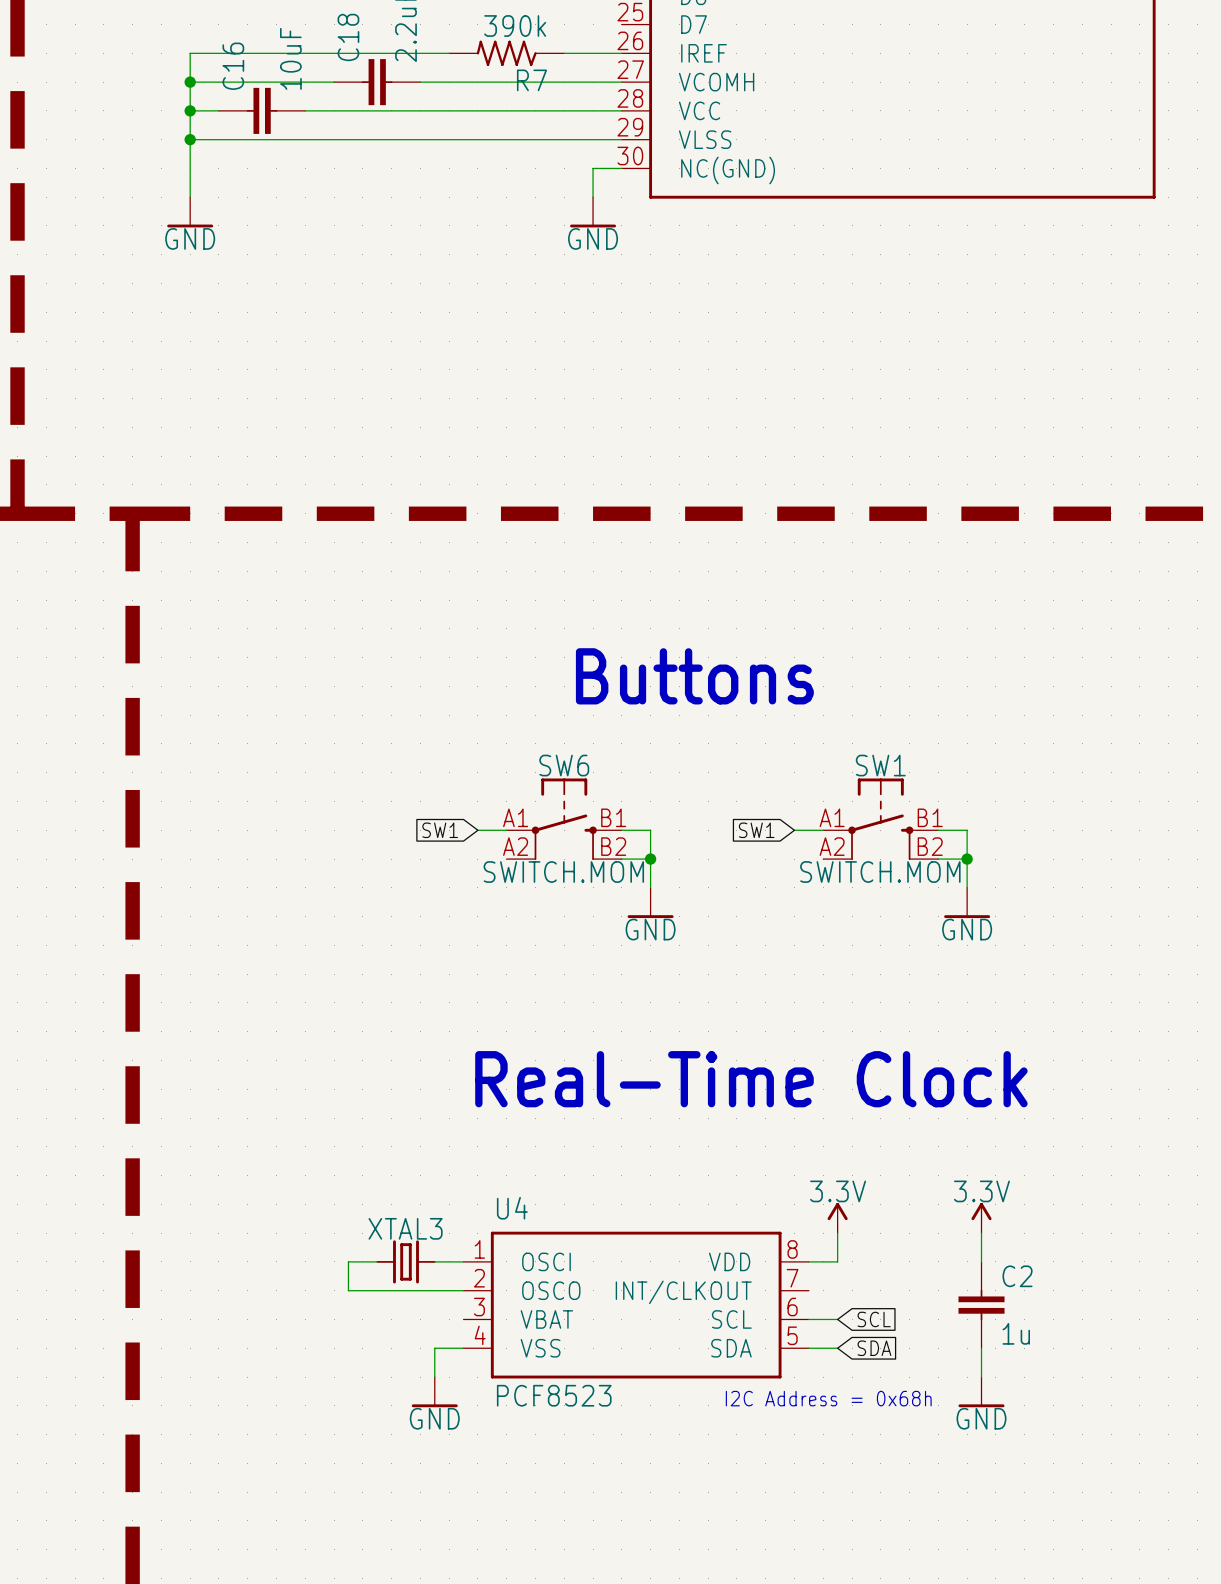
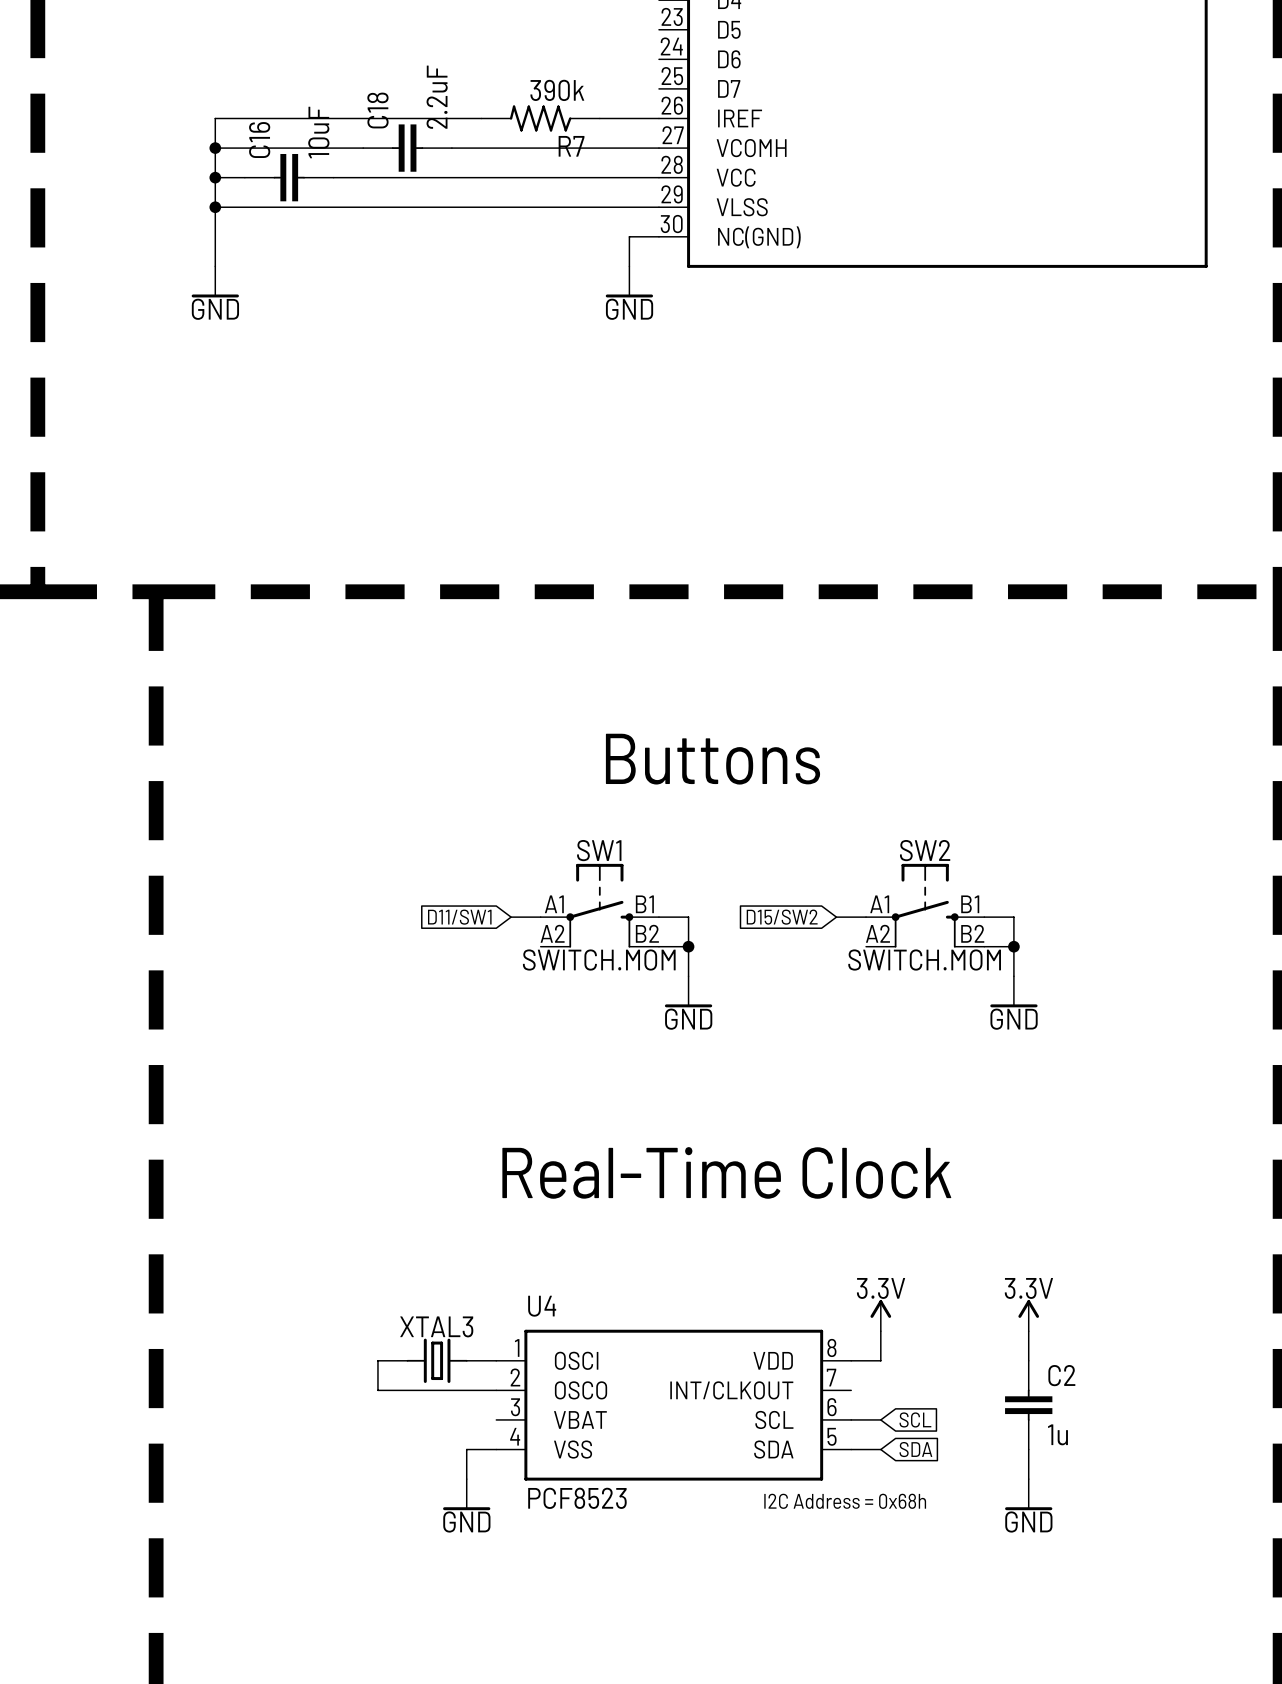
SW6 name: SW6 (564, 765) -> SW1 (599, 850)
SW1 name: SW1 (880, 765) -> SW2 (925, 850)
global label: SW1 (440, 830) -> D11/SW1 (459, 917)
global label: SW1 (756, 830) -> D15/SW2 (782, 917)

